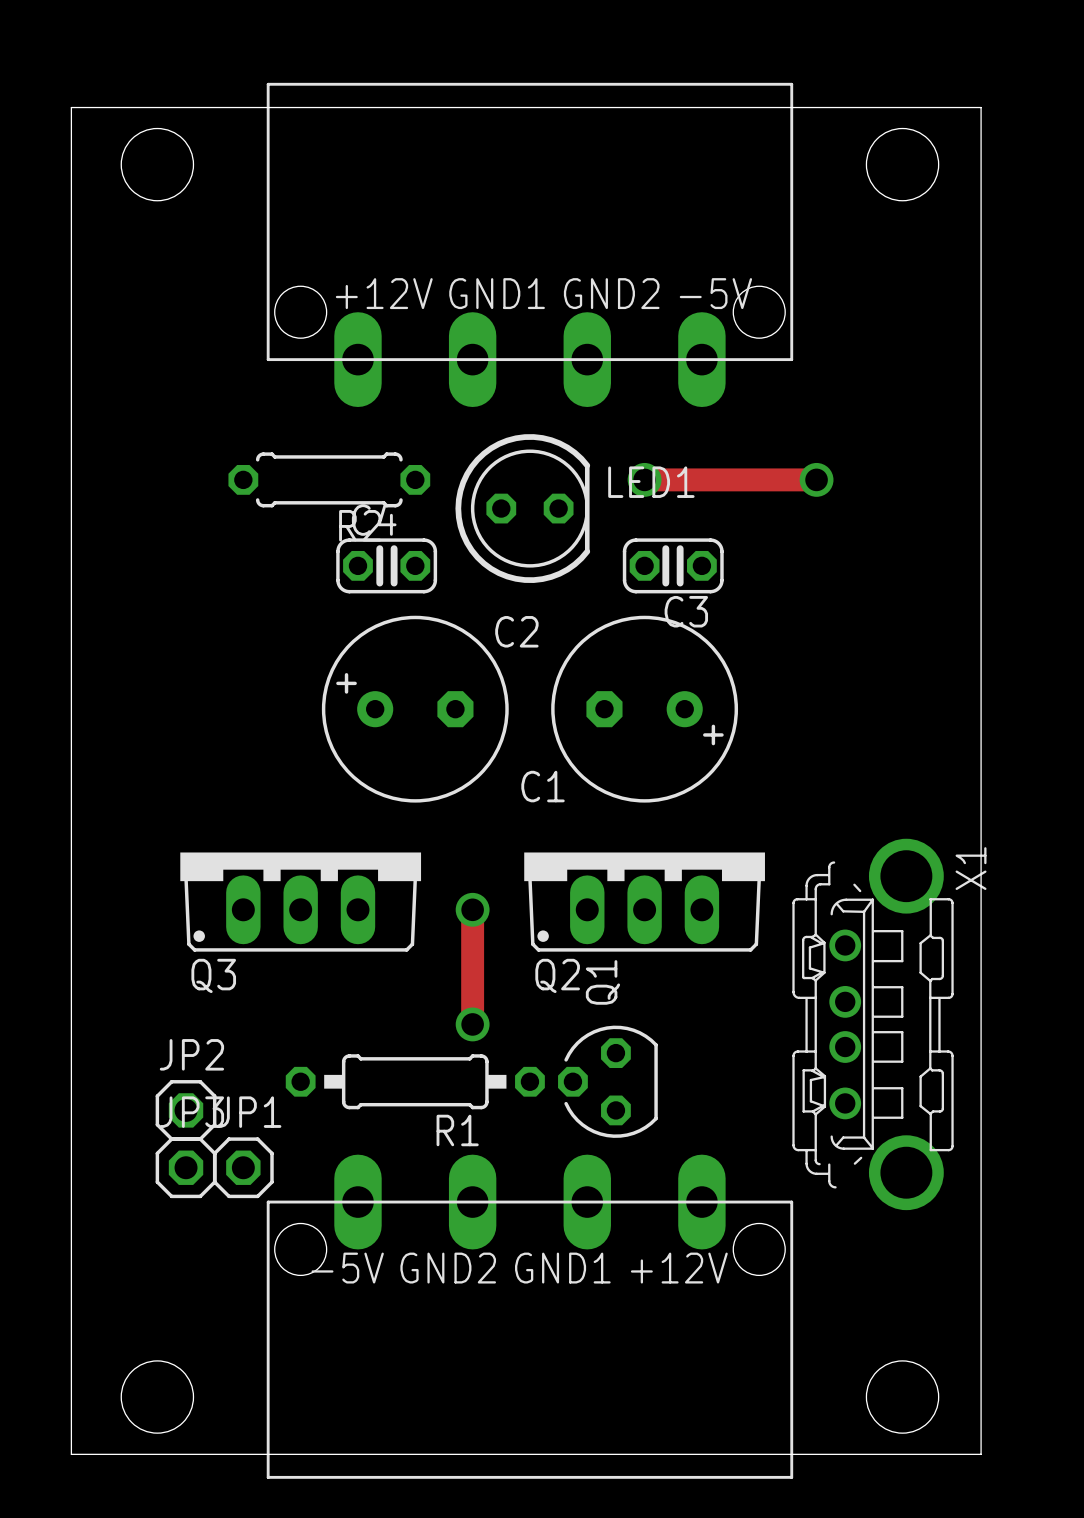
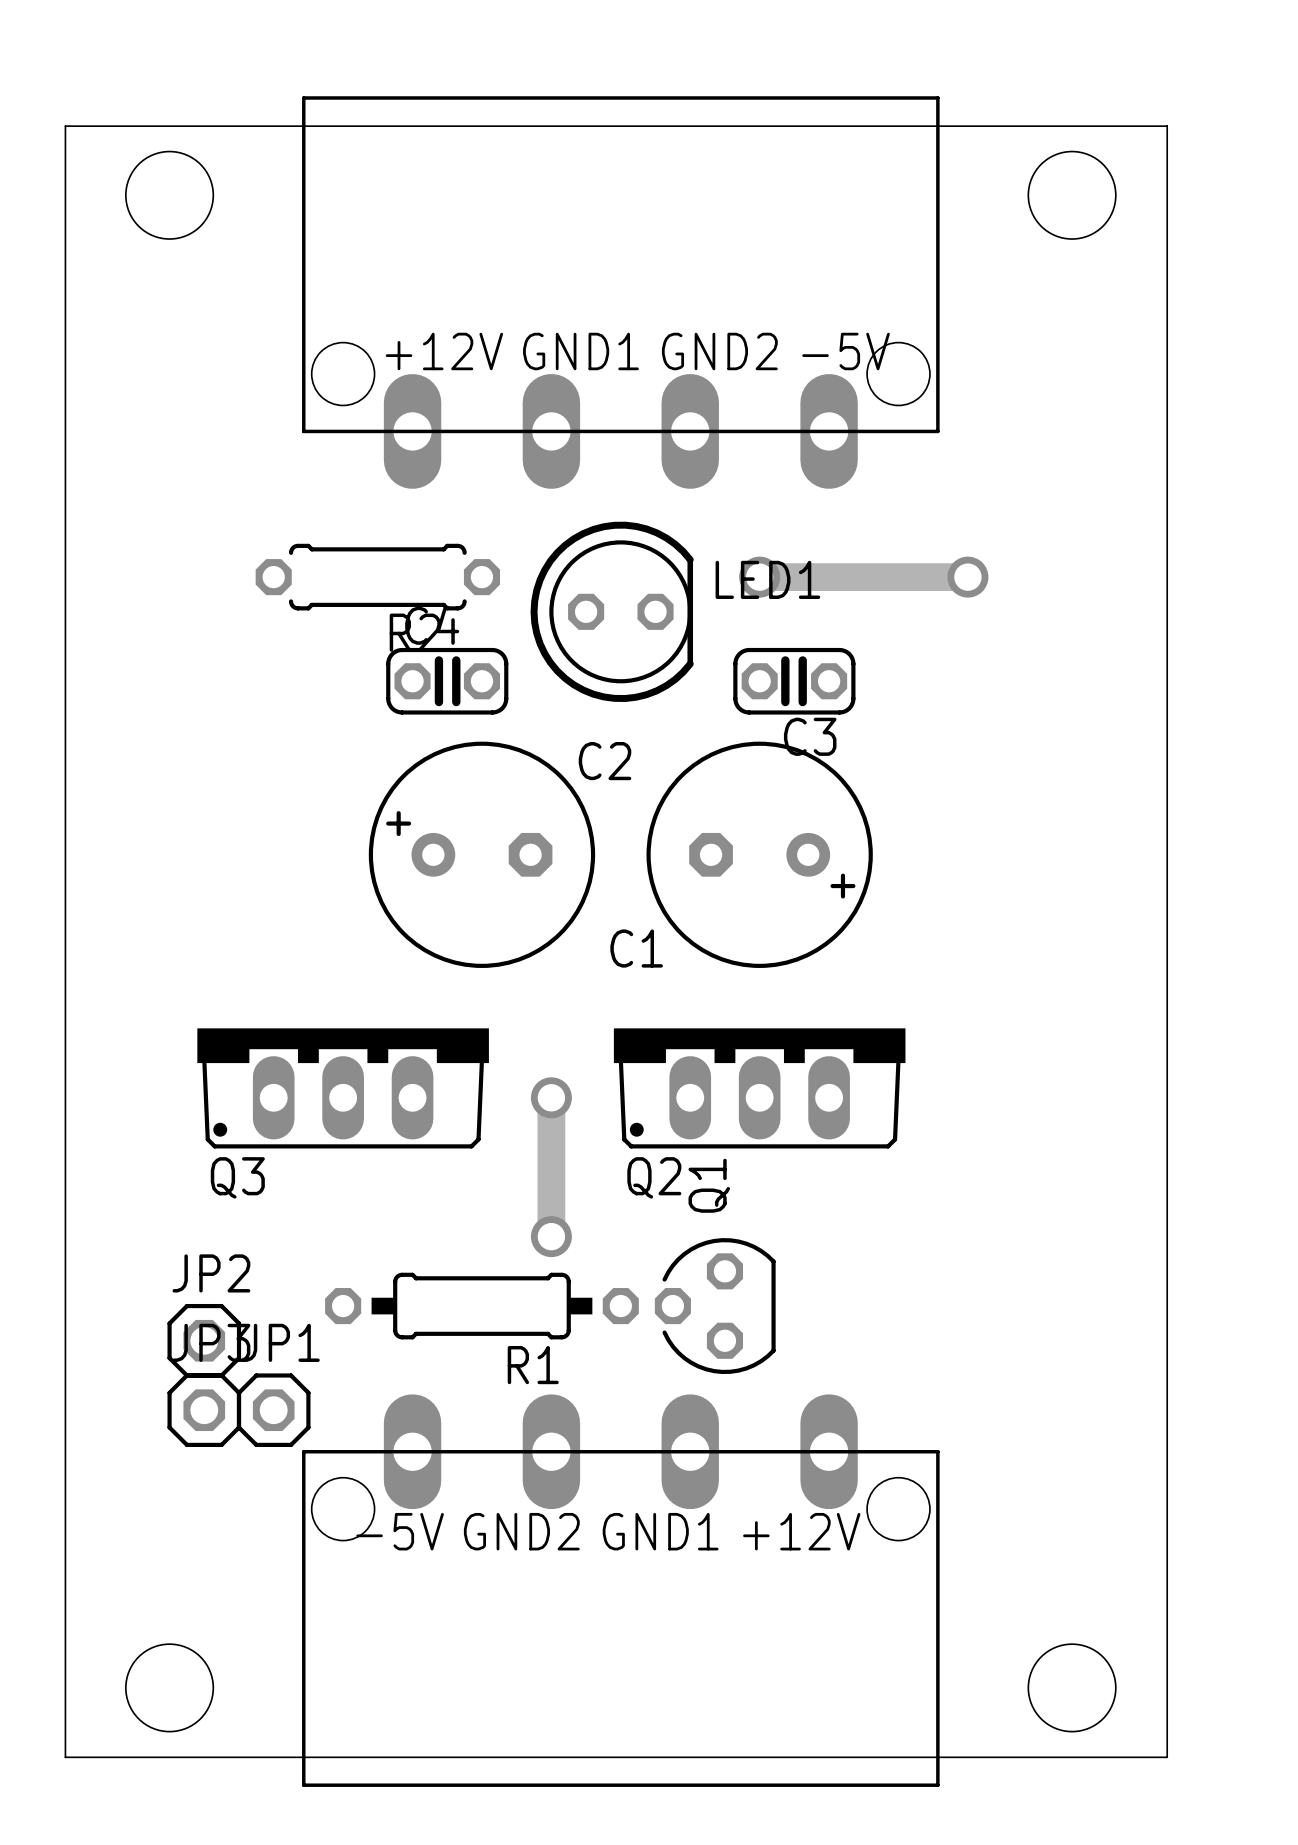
X1: (873, 1024) -> none

